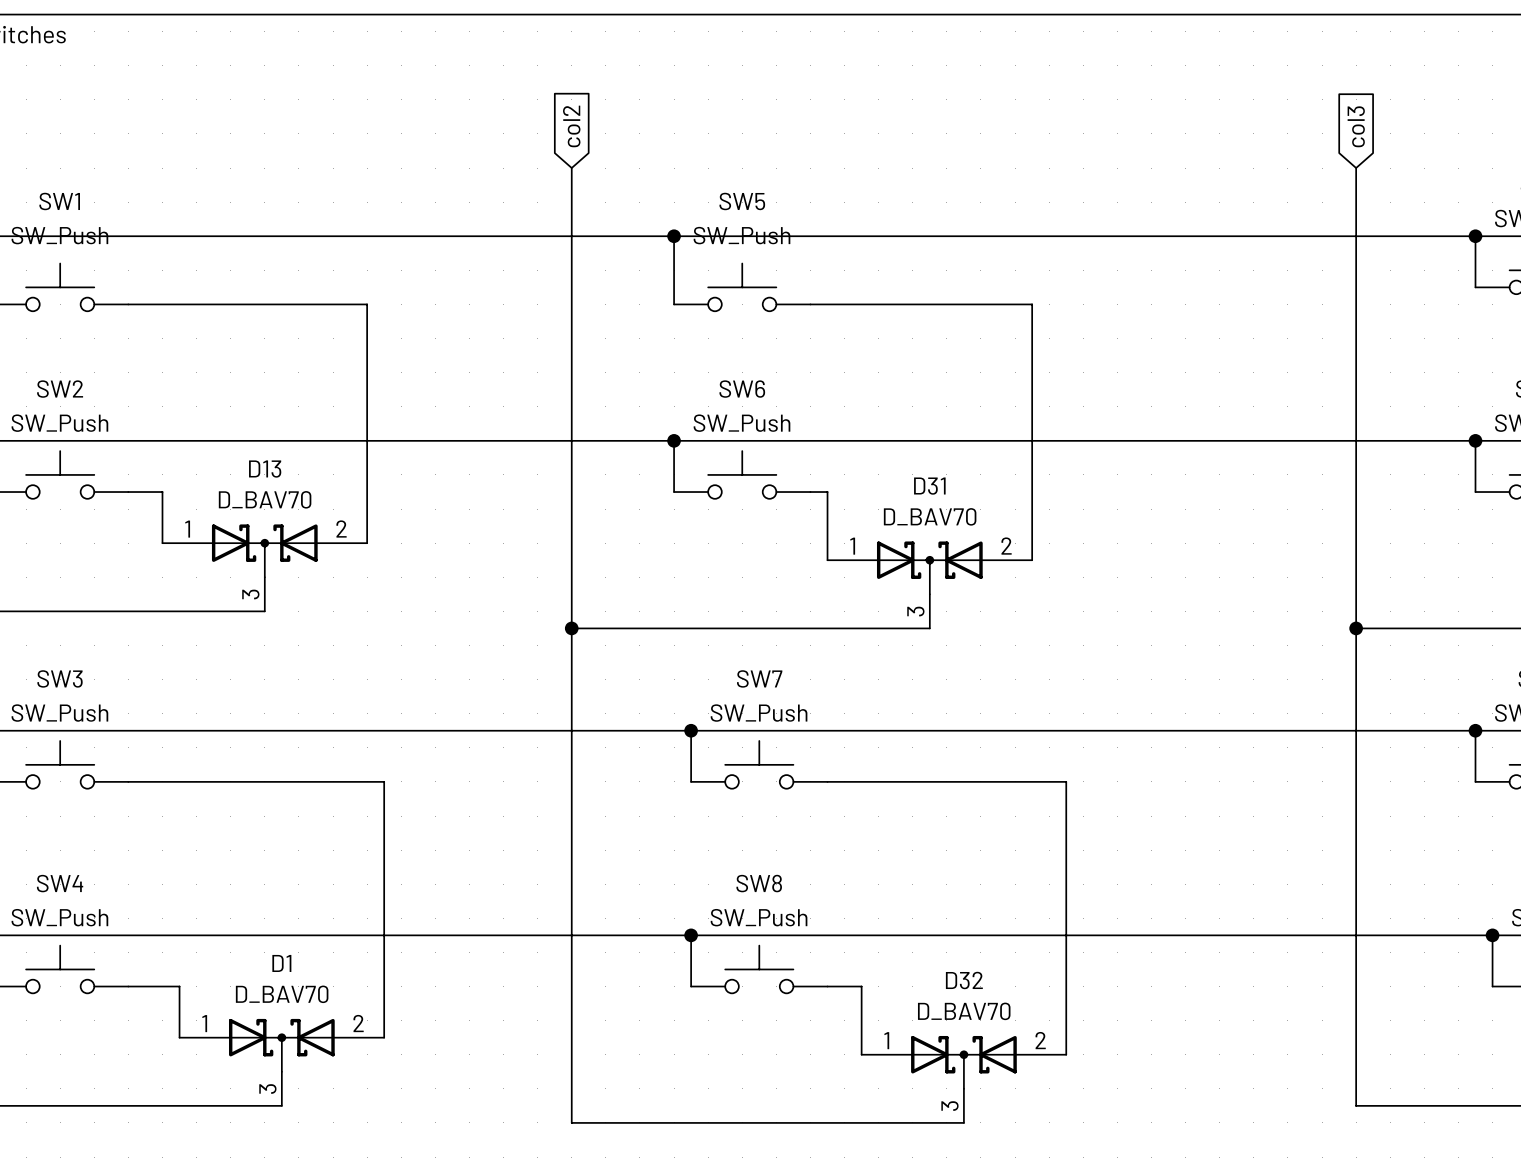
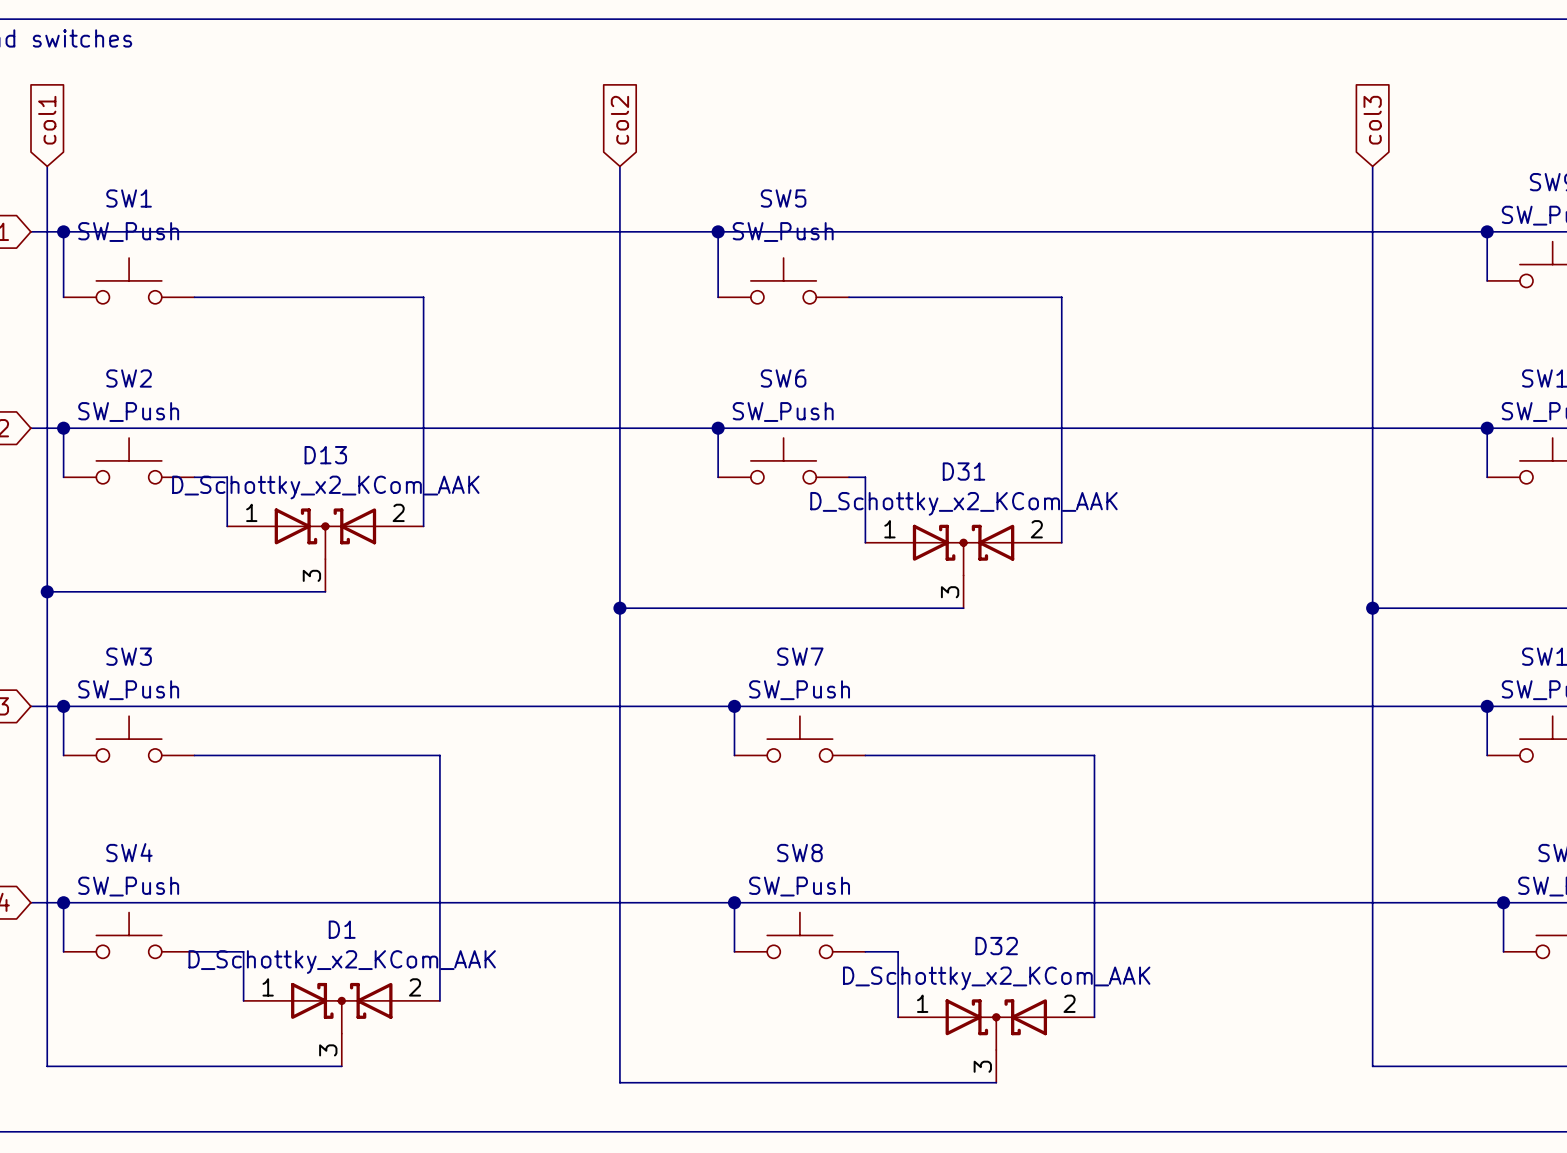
D13 value: D_BAV70 (265, 499) -> D_Schottky_x2_KCom_AAK (325, 487)
D31 value: D_BAV70 (930, 516) -> D_Schottky_x2_KCom_AAK (963, 503)
D1 value: D_BAV70 (282, 994) -> D_Schottky_x2_KCom_AAK (342, 962)
D32 value: D_BAV70 (964, 1011) -> D_Schottky_x2_KCom_AAK (996, 978)

